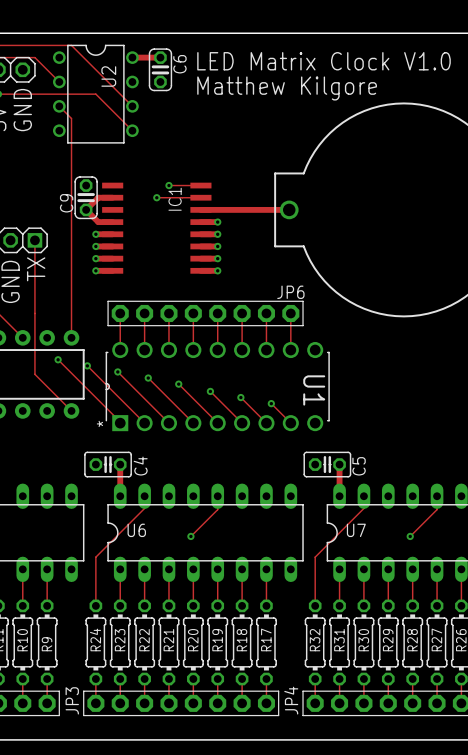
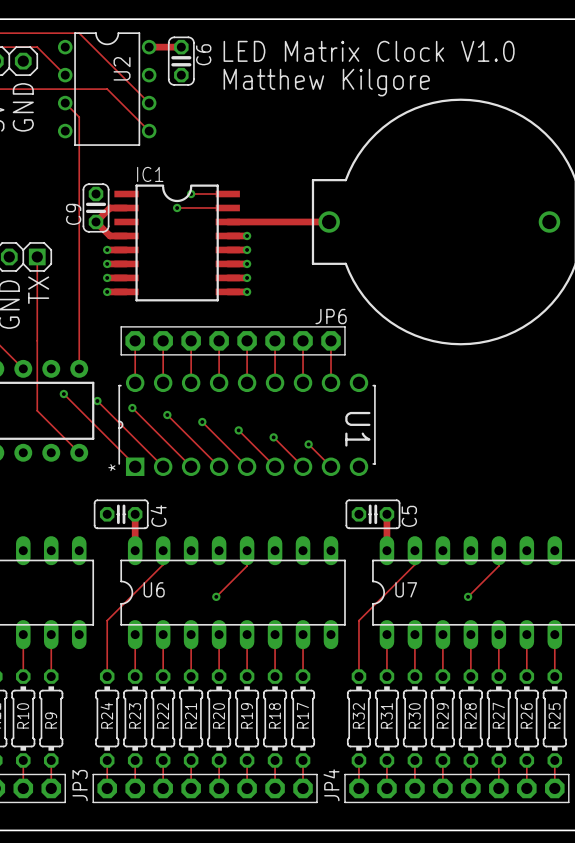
line: none -> (163, 185) (136, 185) (136, 300) (217, 300) (217, 185) (191, 185)
line: none -> (163, 187) (167, 196) (177, 201) (187, 196) (191, 187)
IC1 name rotation: 0° (175, 199) -> 90° clockwise (150, 174)
IC1 name position: IC1 (175, 199) -> IC1 (150, 174)

